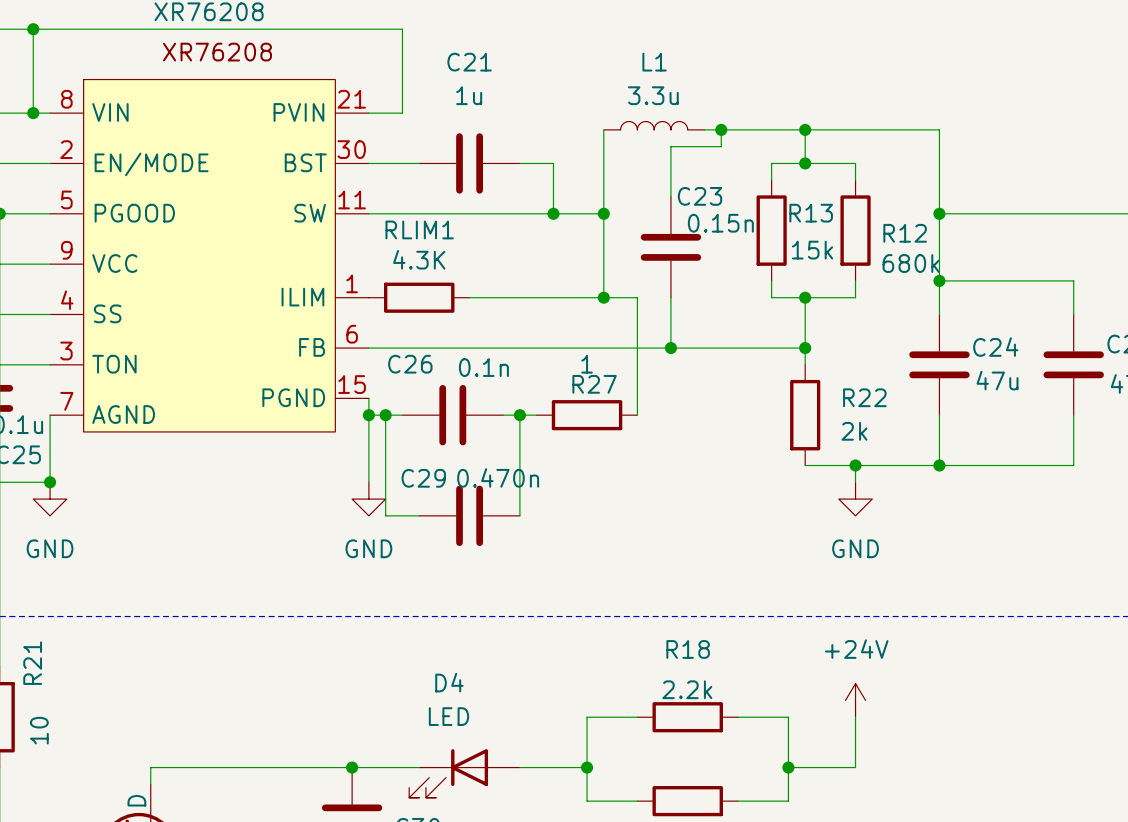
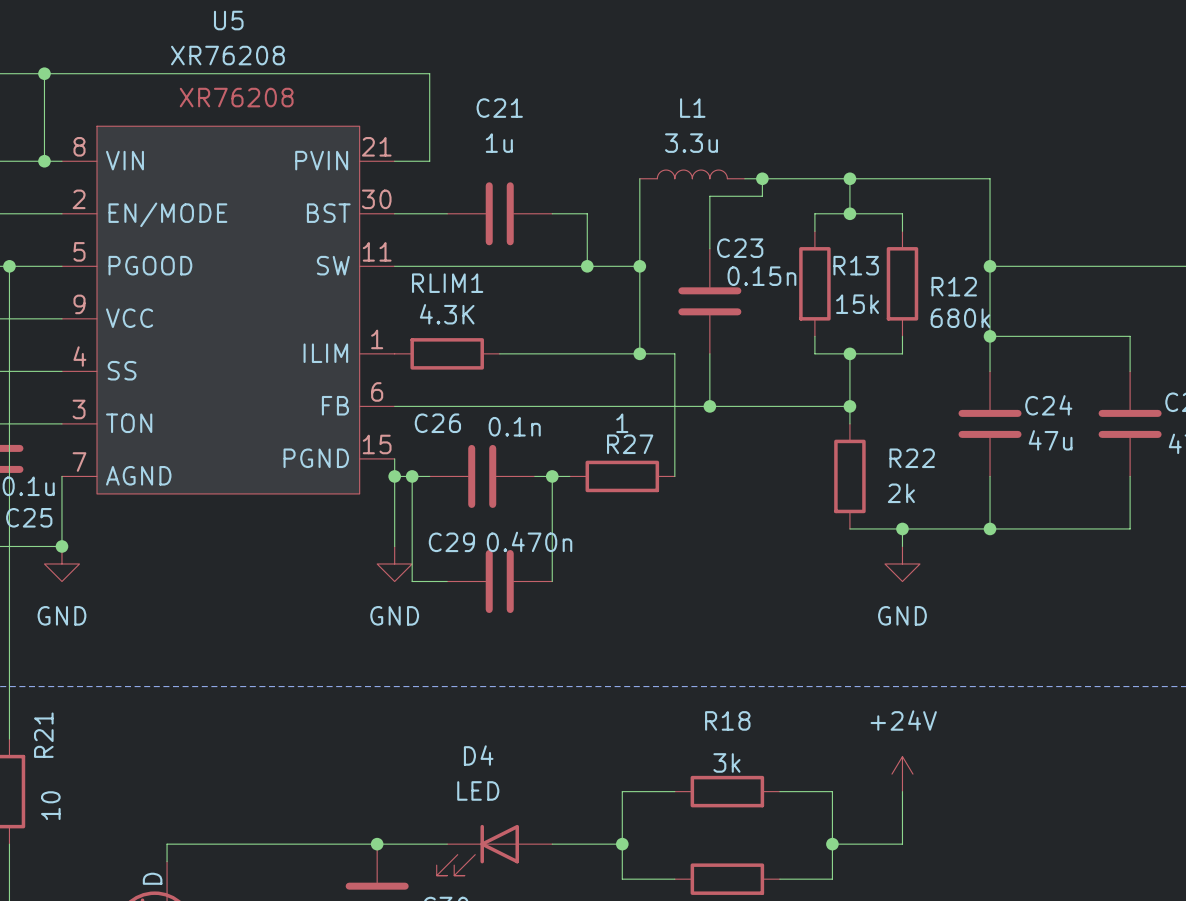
R18 value: 2.2k (687, 689) -> 3k (726, 762)

